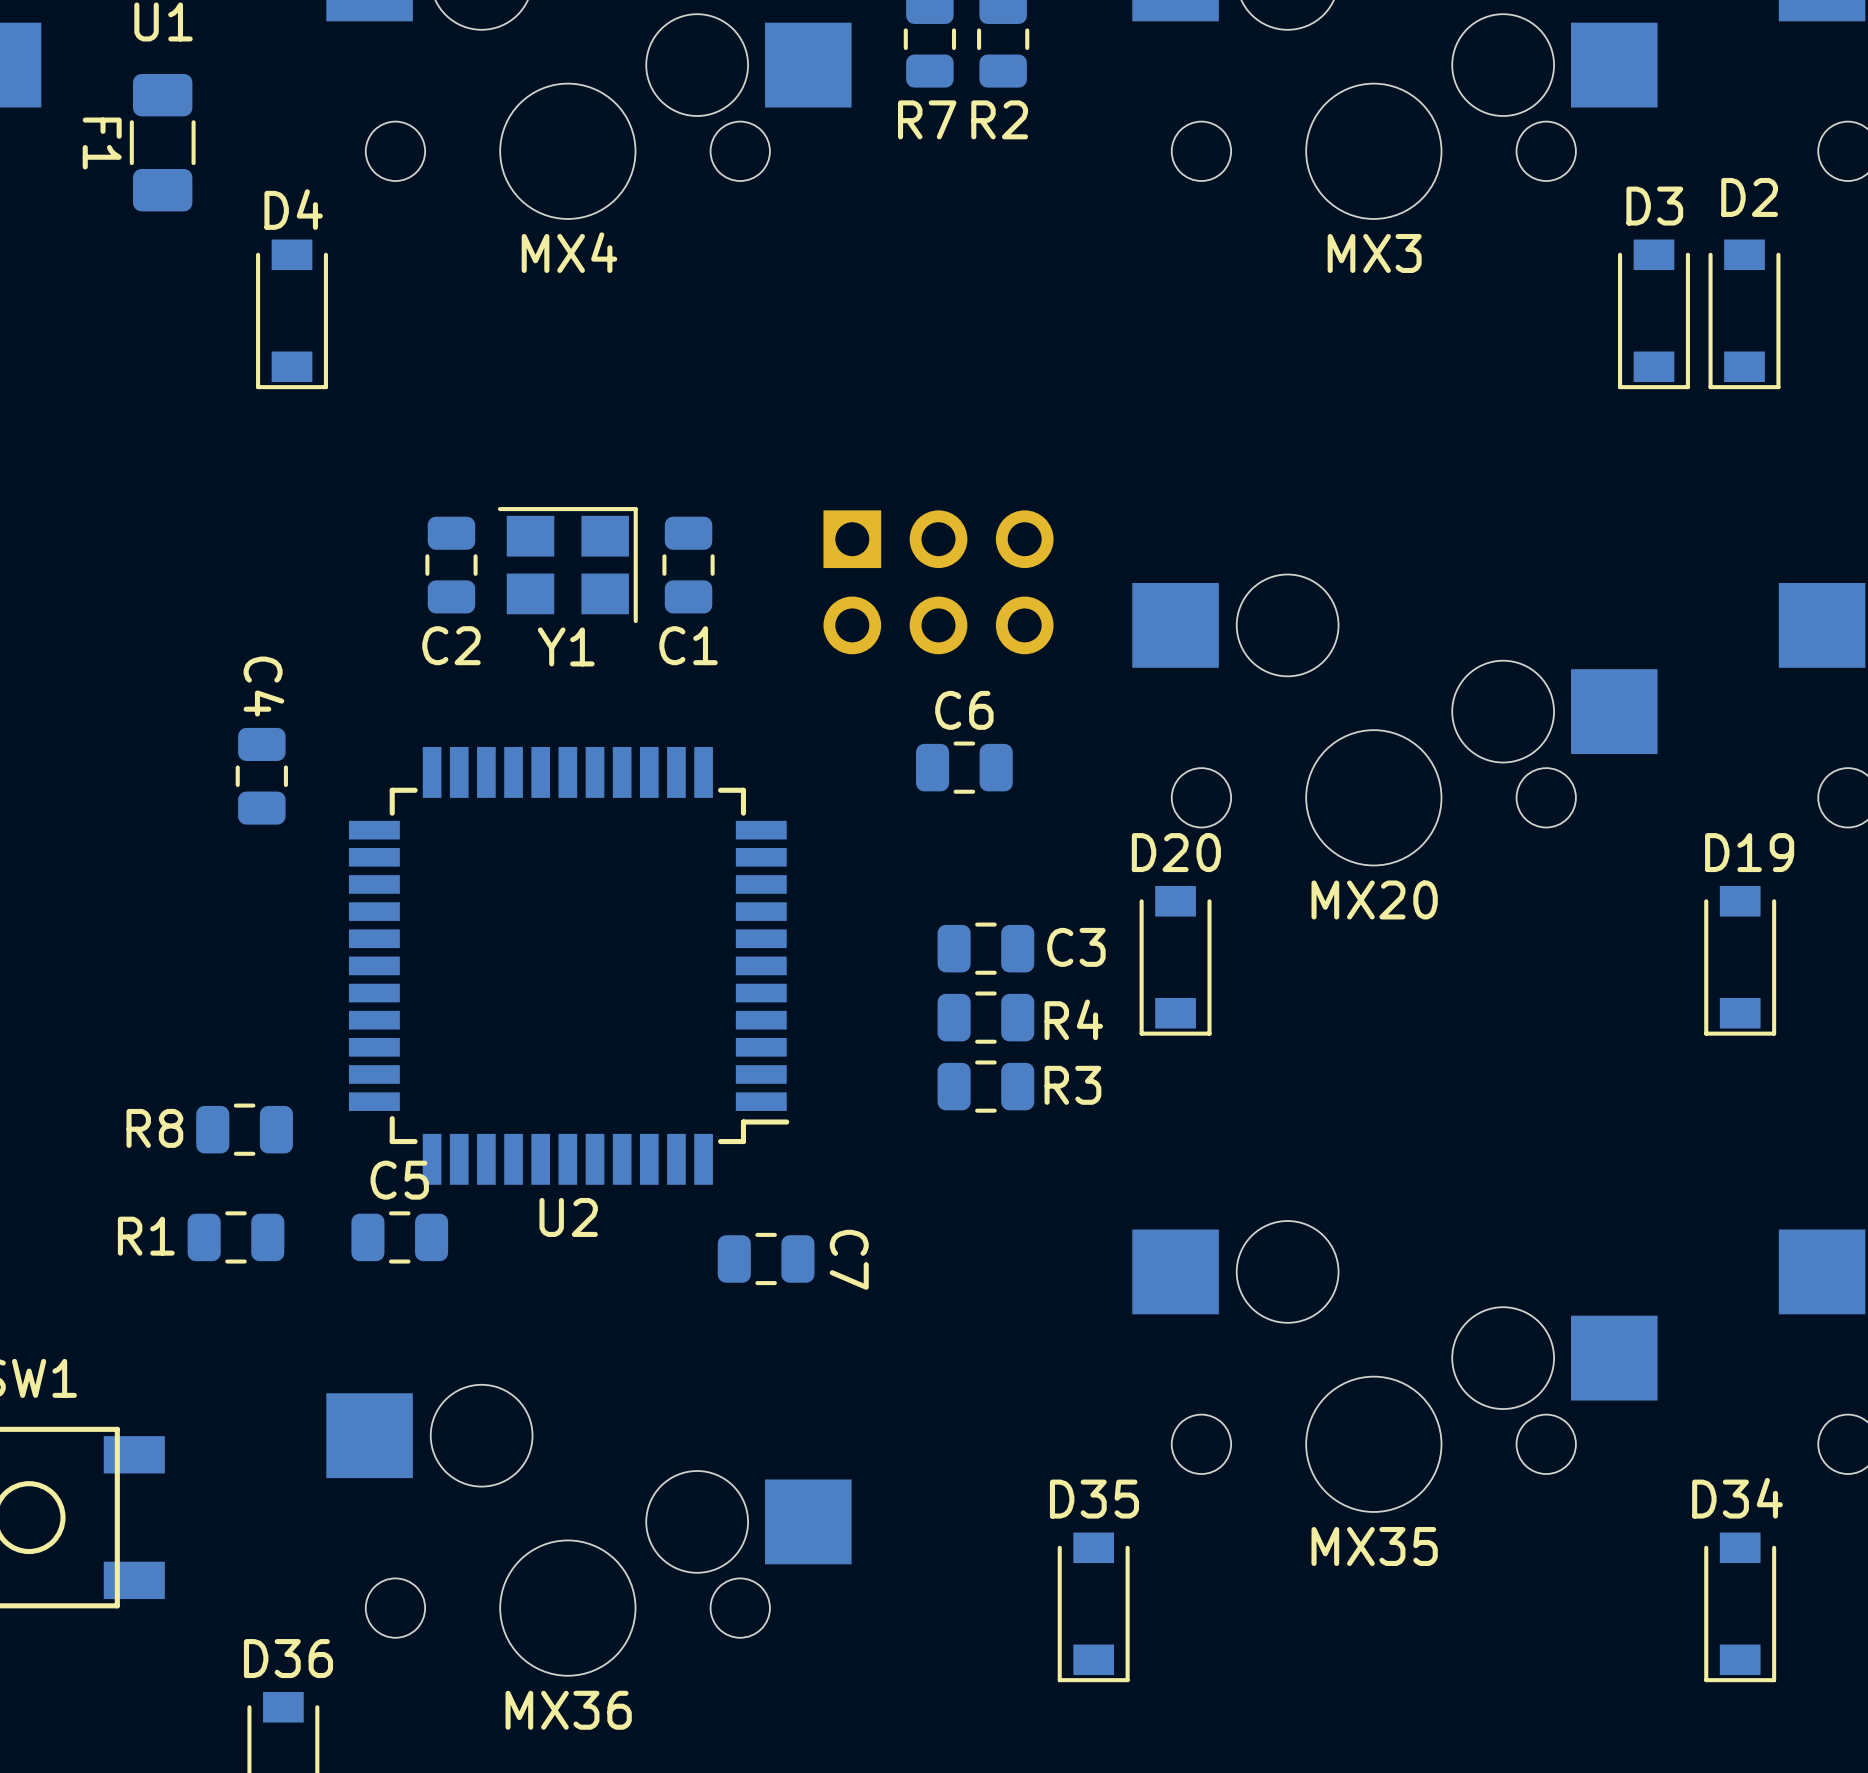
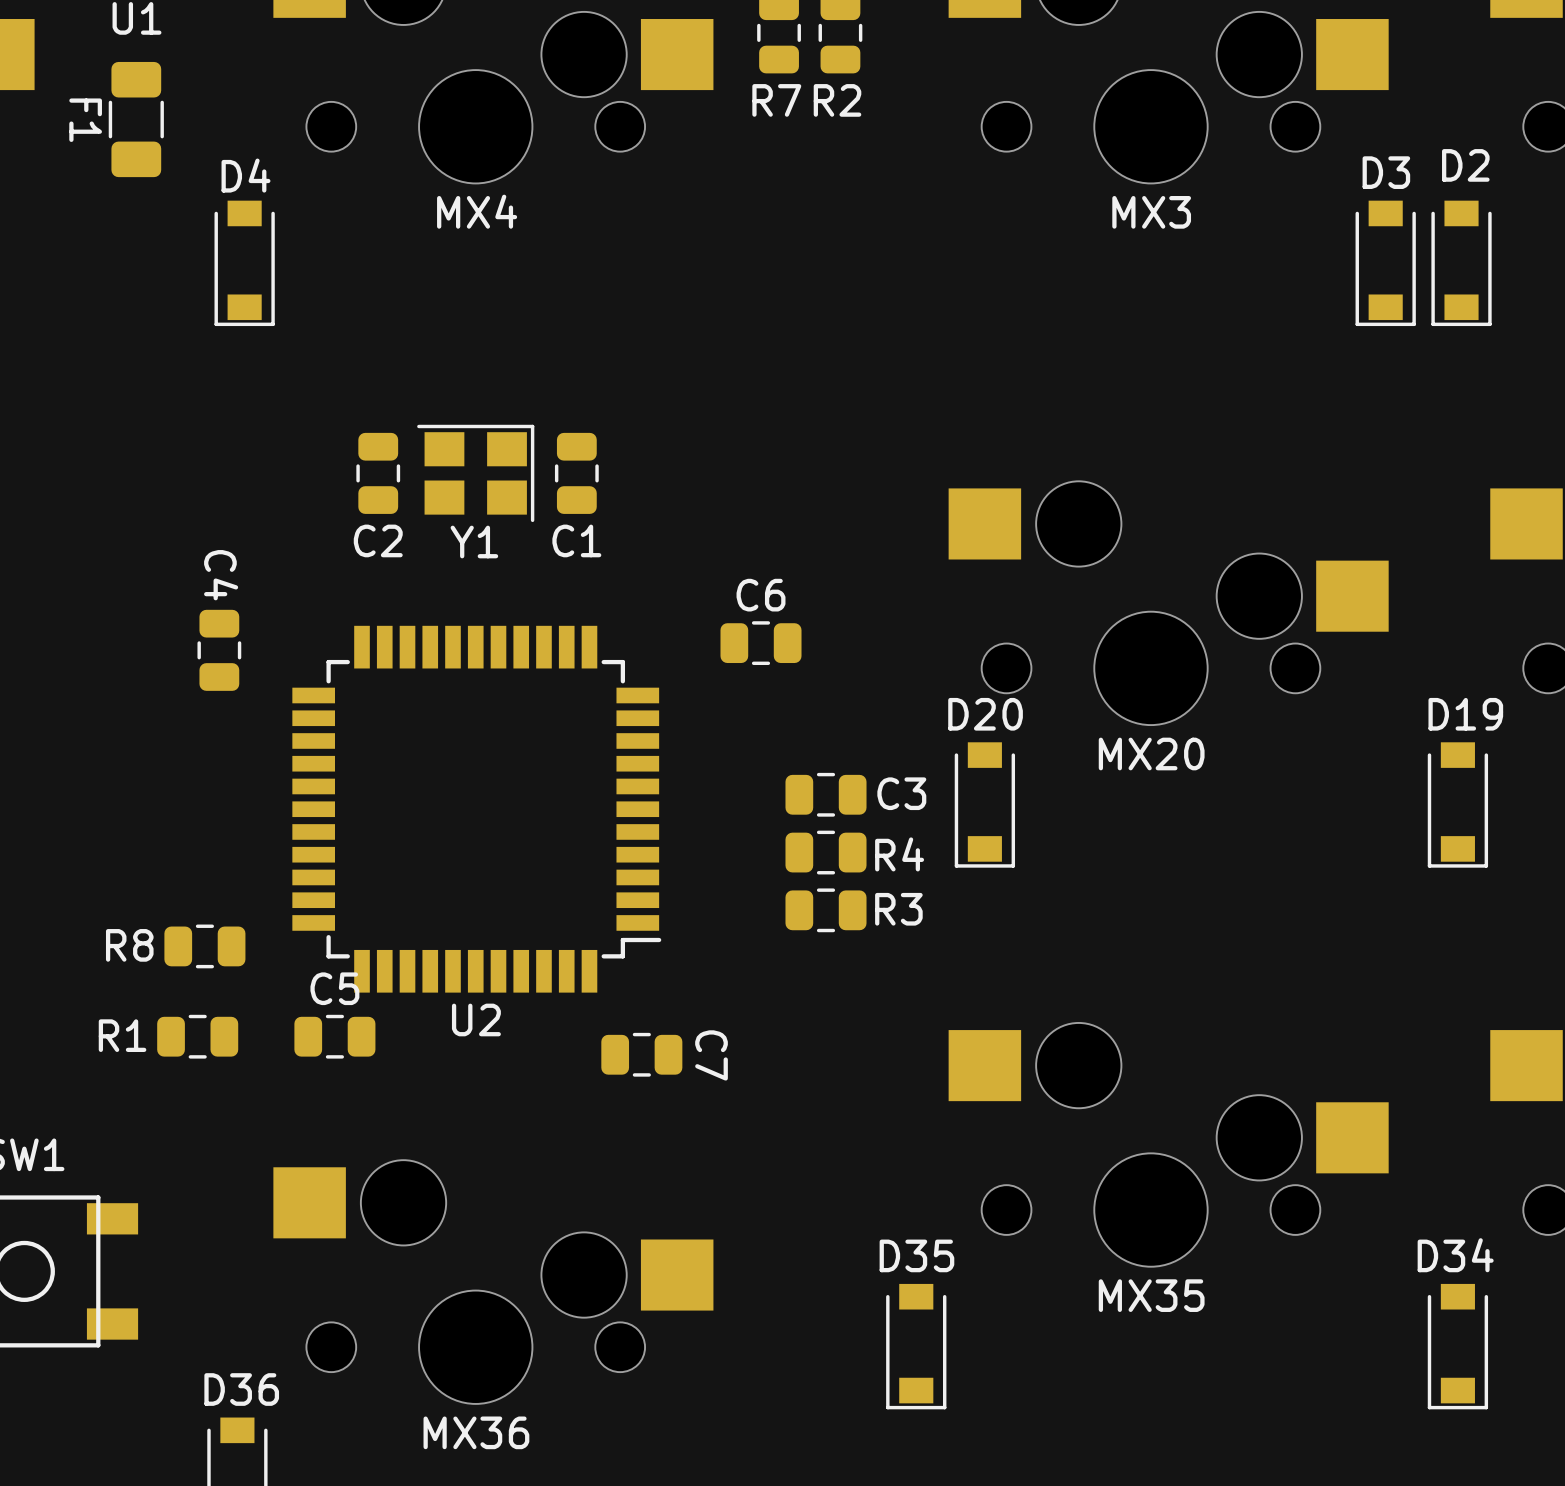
part: (938, 582) -> none
C6 position: (964, 767) -> (761, 643)

